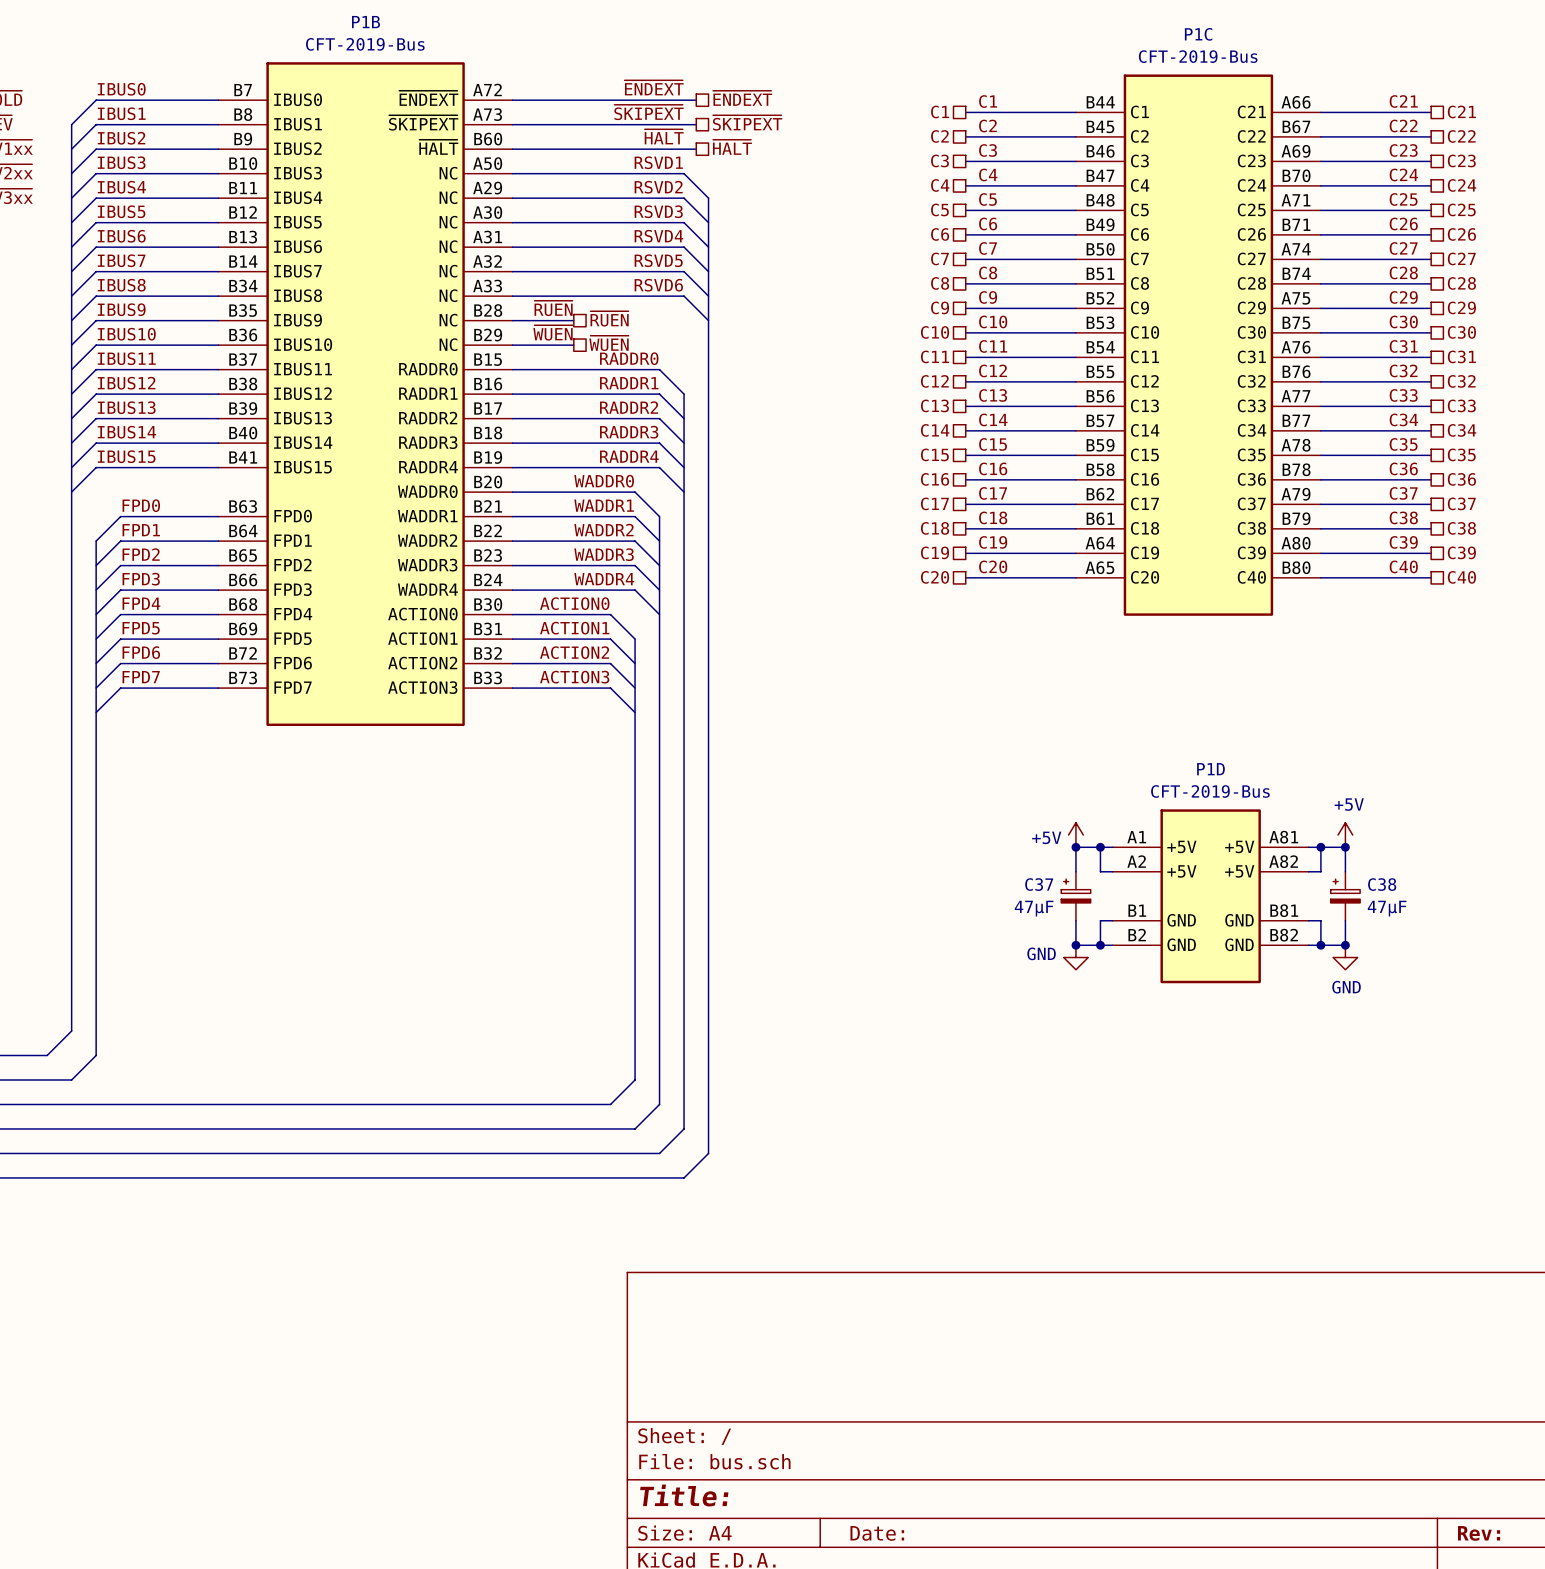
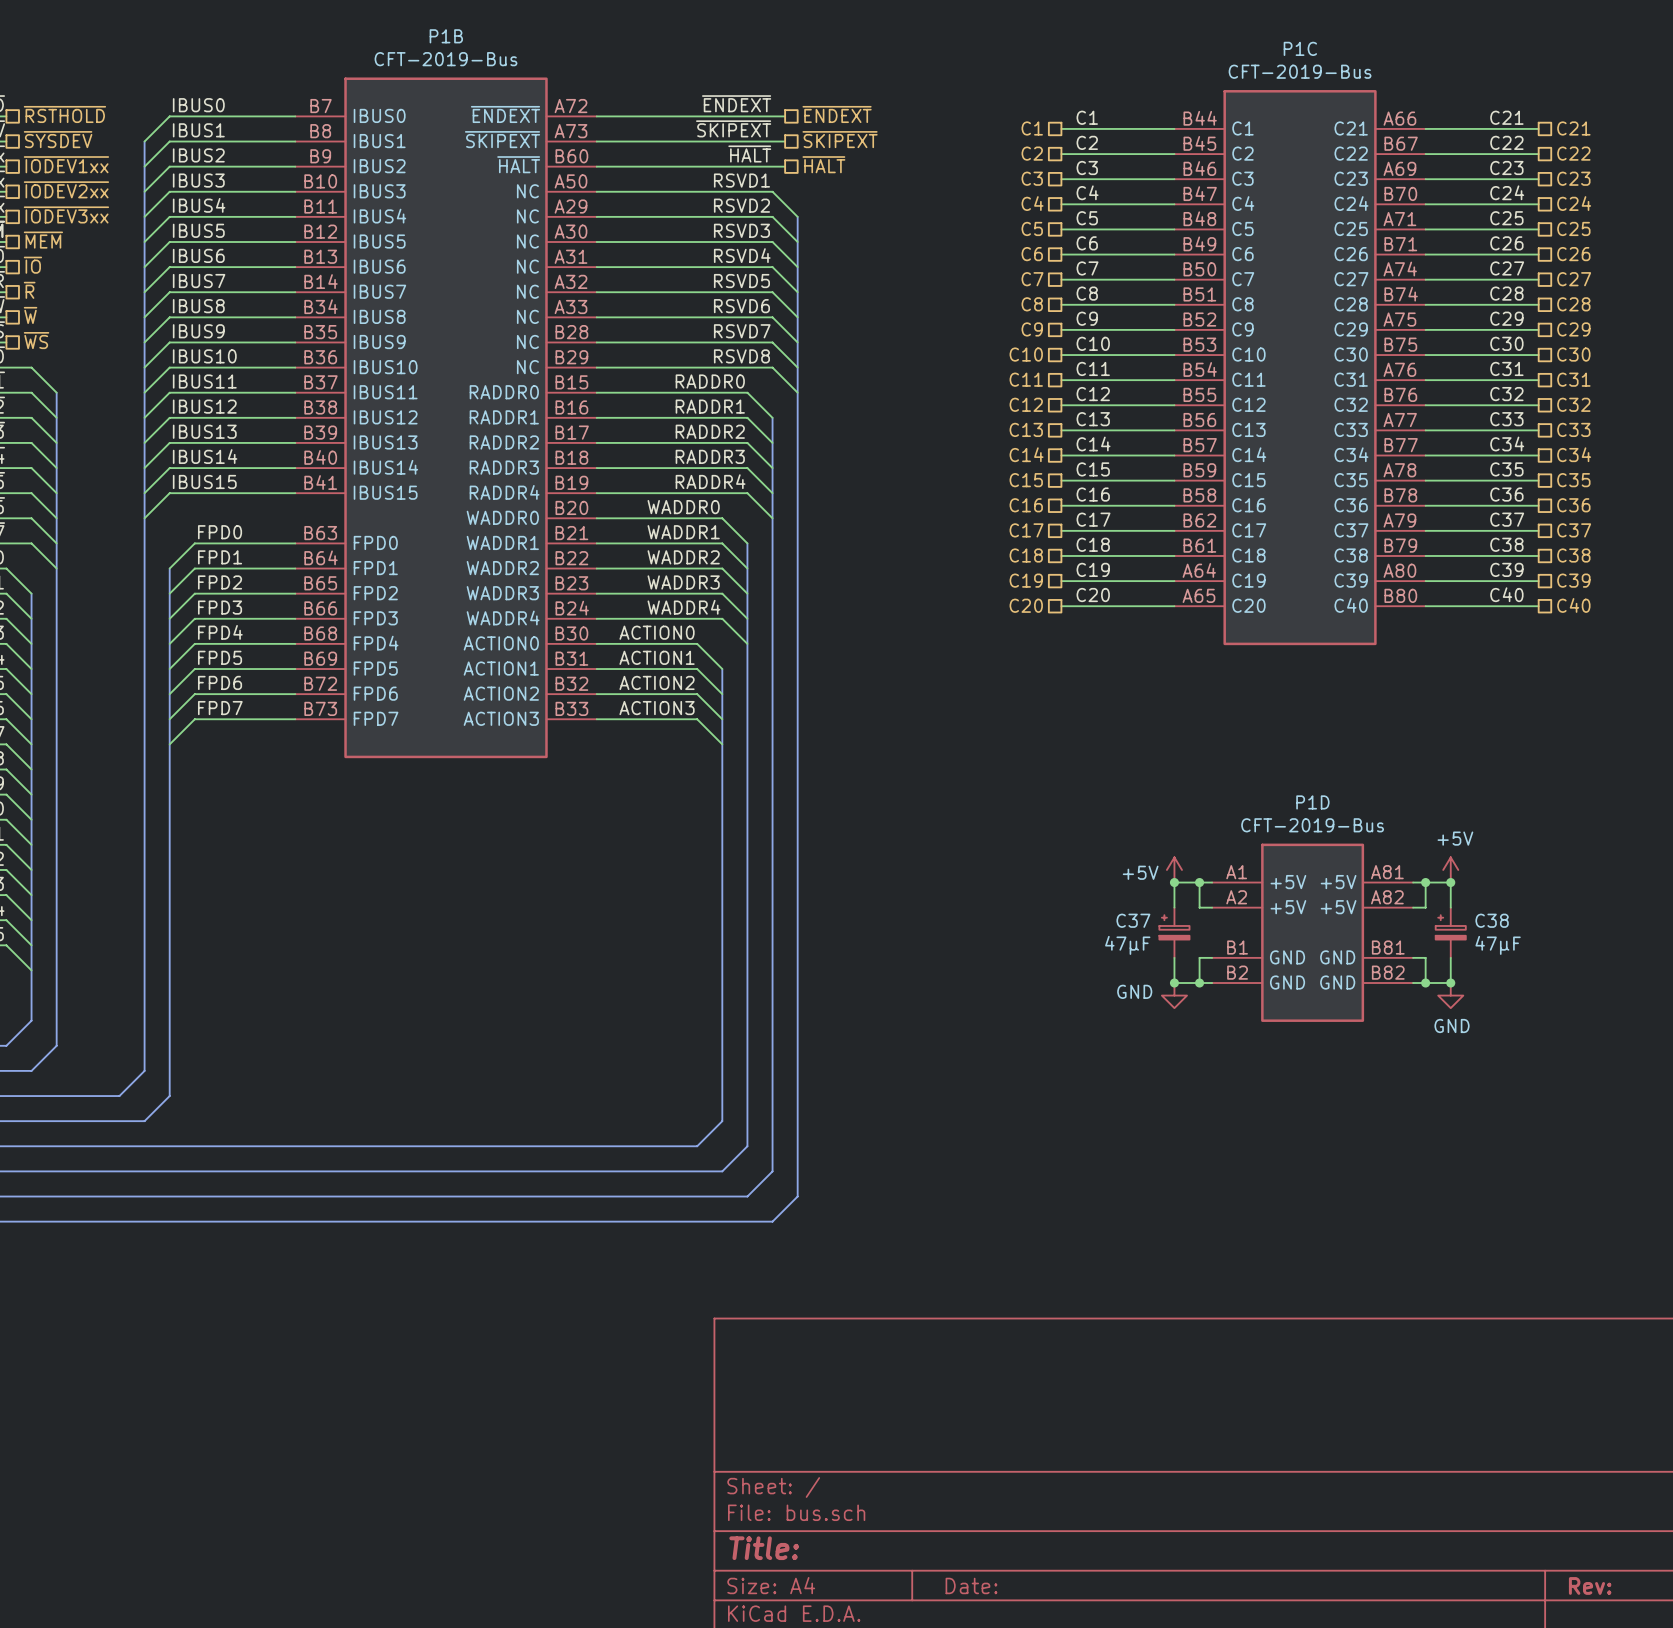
label: ~{RUEN} (553, 308) -> none
label: none -> RSVD7 (742, 331)
hierarchical label: ~{RUEN} (609, 318) -> none
wire: none -> (659, 342) (772, 342) (797, 367)
label: ~{WUEN} (553, 332) -> none
label: none -> RSVD8 (741, 356)
hierarchical label: ~{WUEN} (609, 343) -> none
wire: none -> (659, 367) (772, 367) (797, 392)

